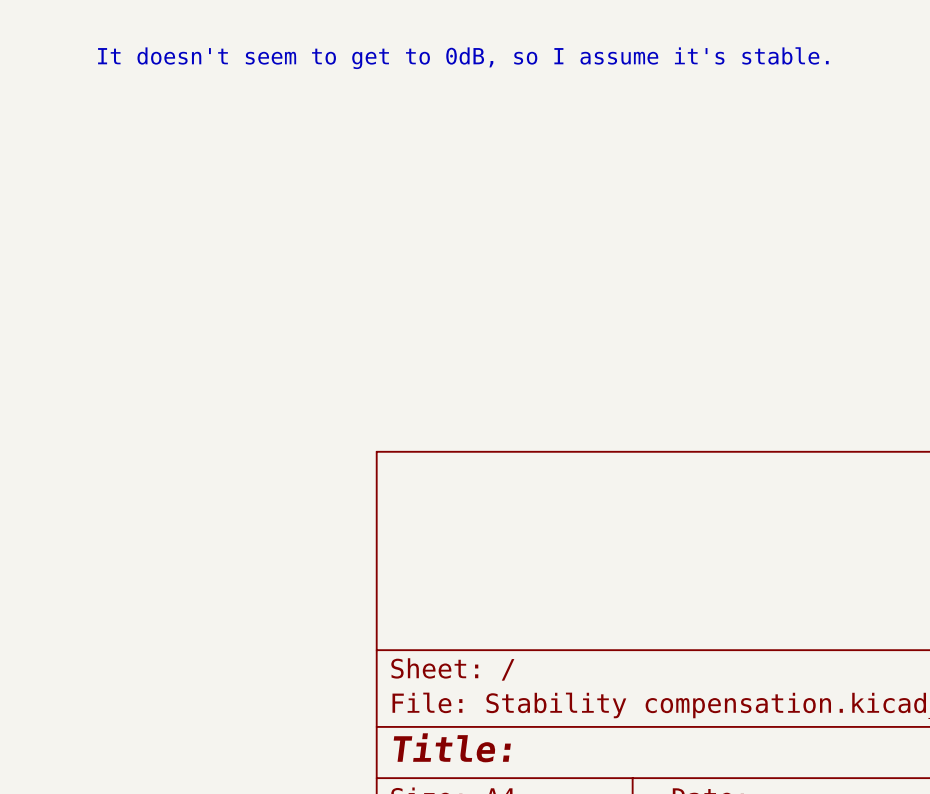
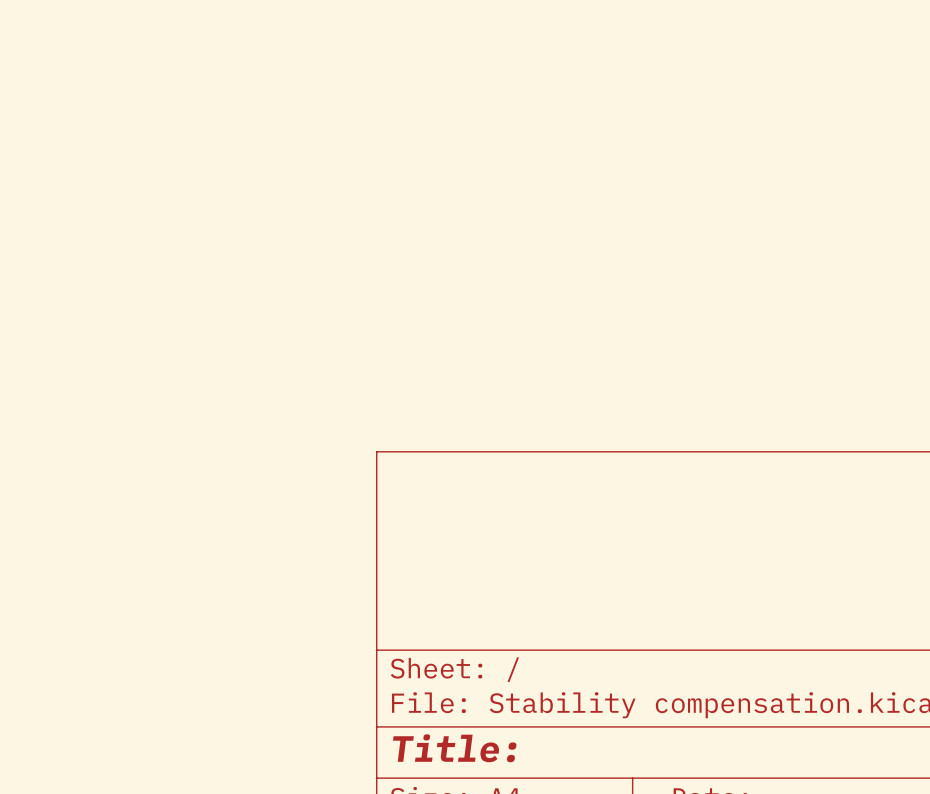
text: It doesn't seem to get to 0dB, so I assume it's stable. (463, 58) -> none

